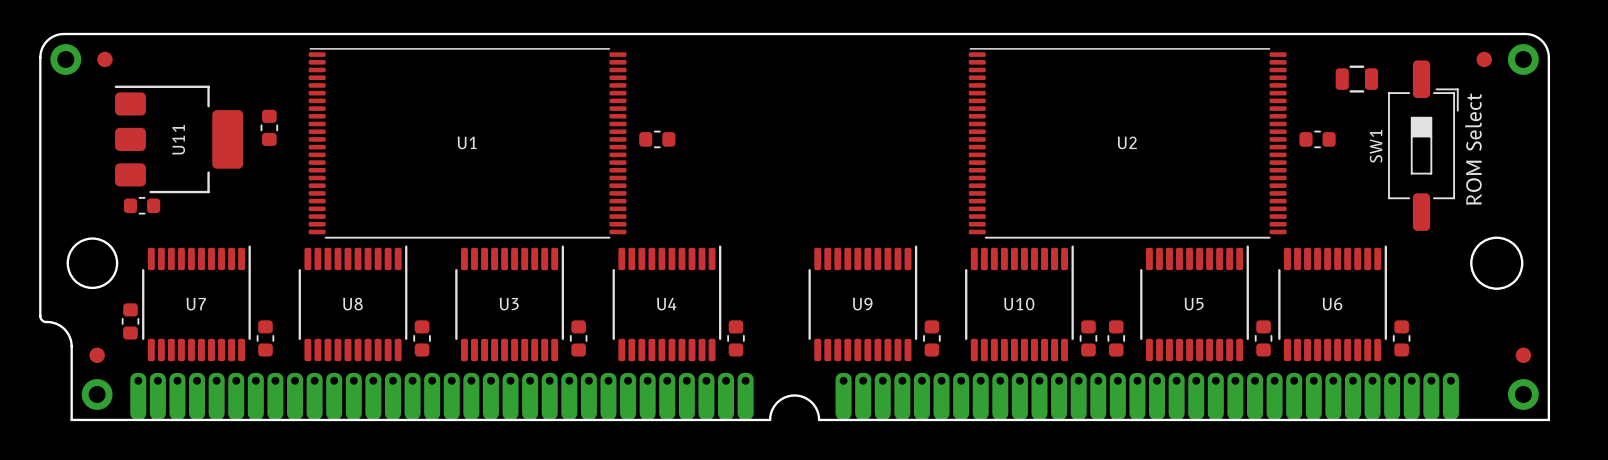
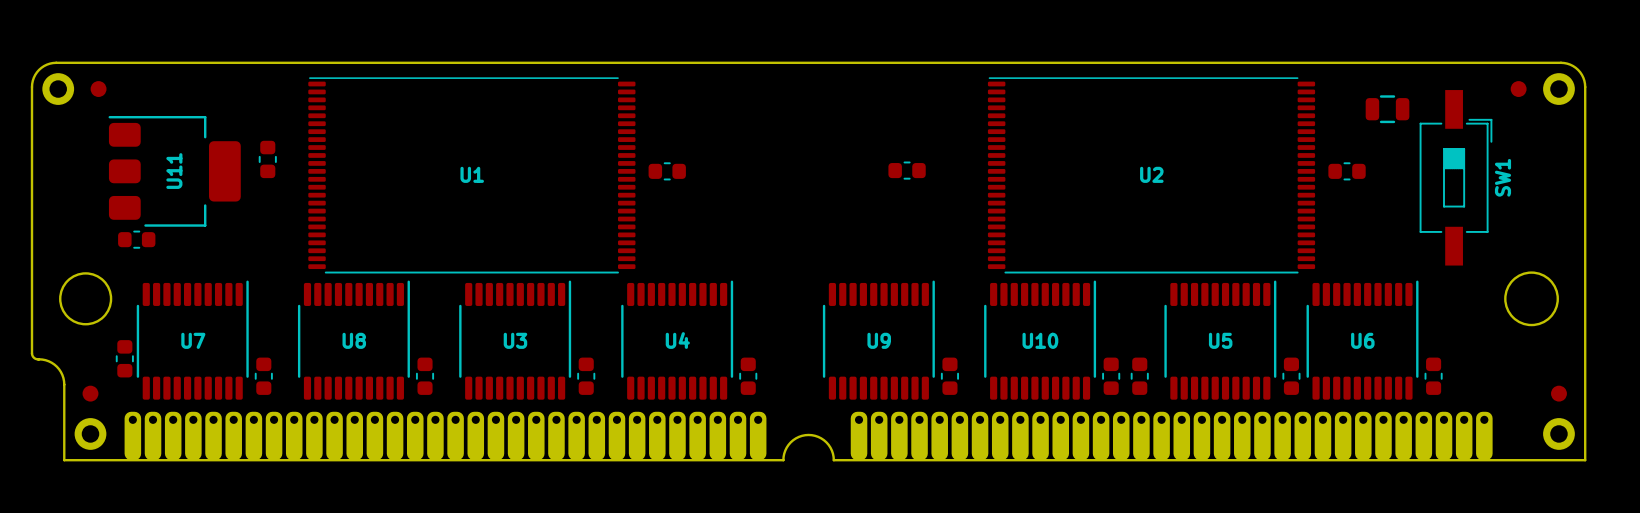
SW1 footprint: [1388, 60, 1459, 231] -> [1419, 90, 1493, 266]
part: none -> (907, 170)
SW1 name position: SW1 (1376, 146) -> SW1 (1503, 177)
SW1 value: ROM Select (1473, 149) -> none

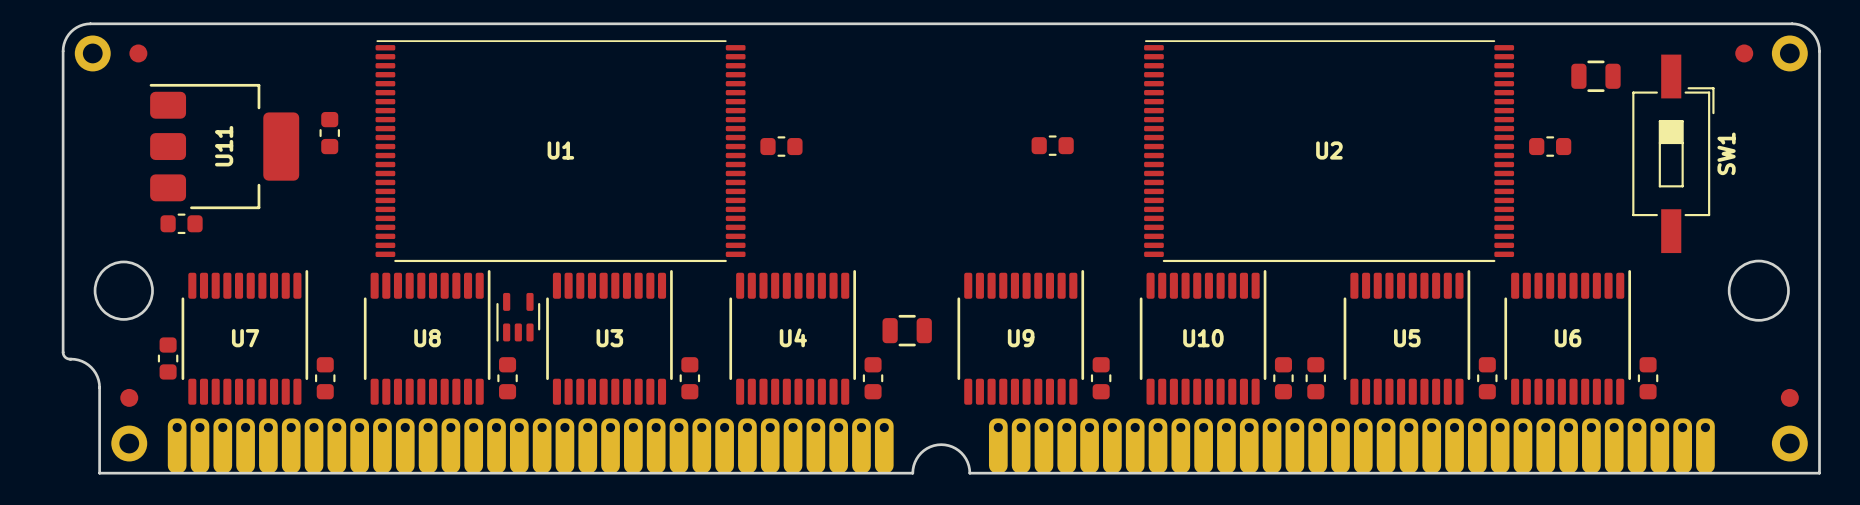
part: none -> (518, 317)
part: none -> (907, 330)

